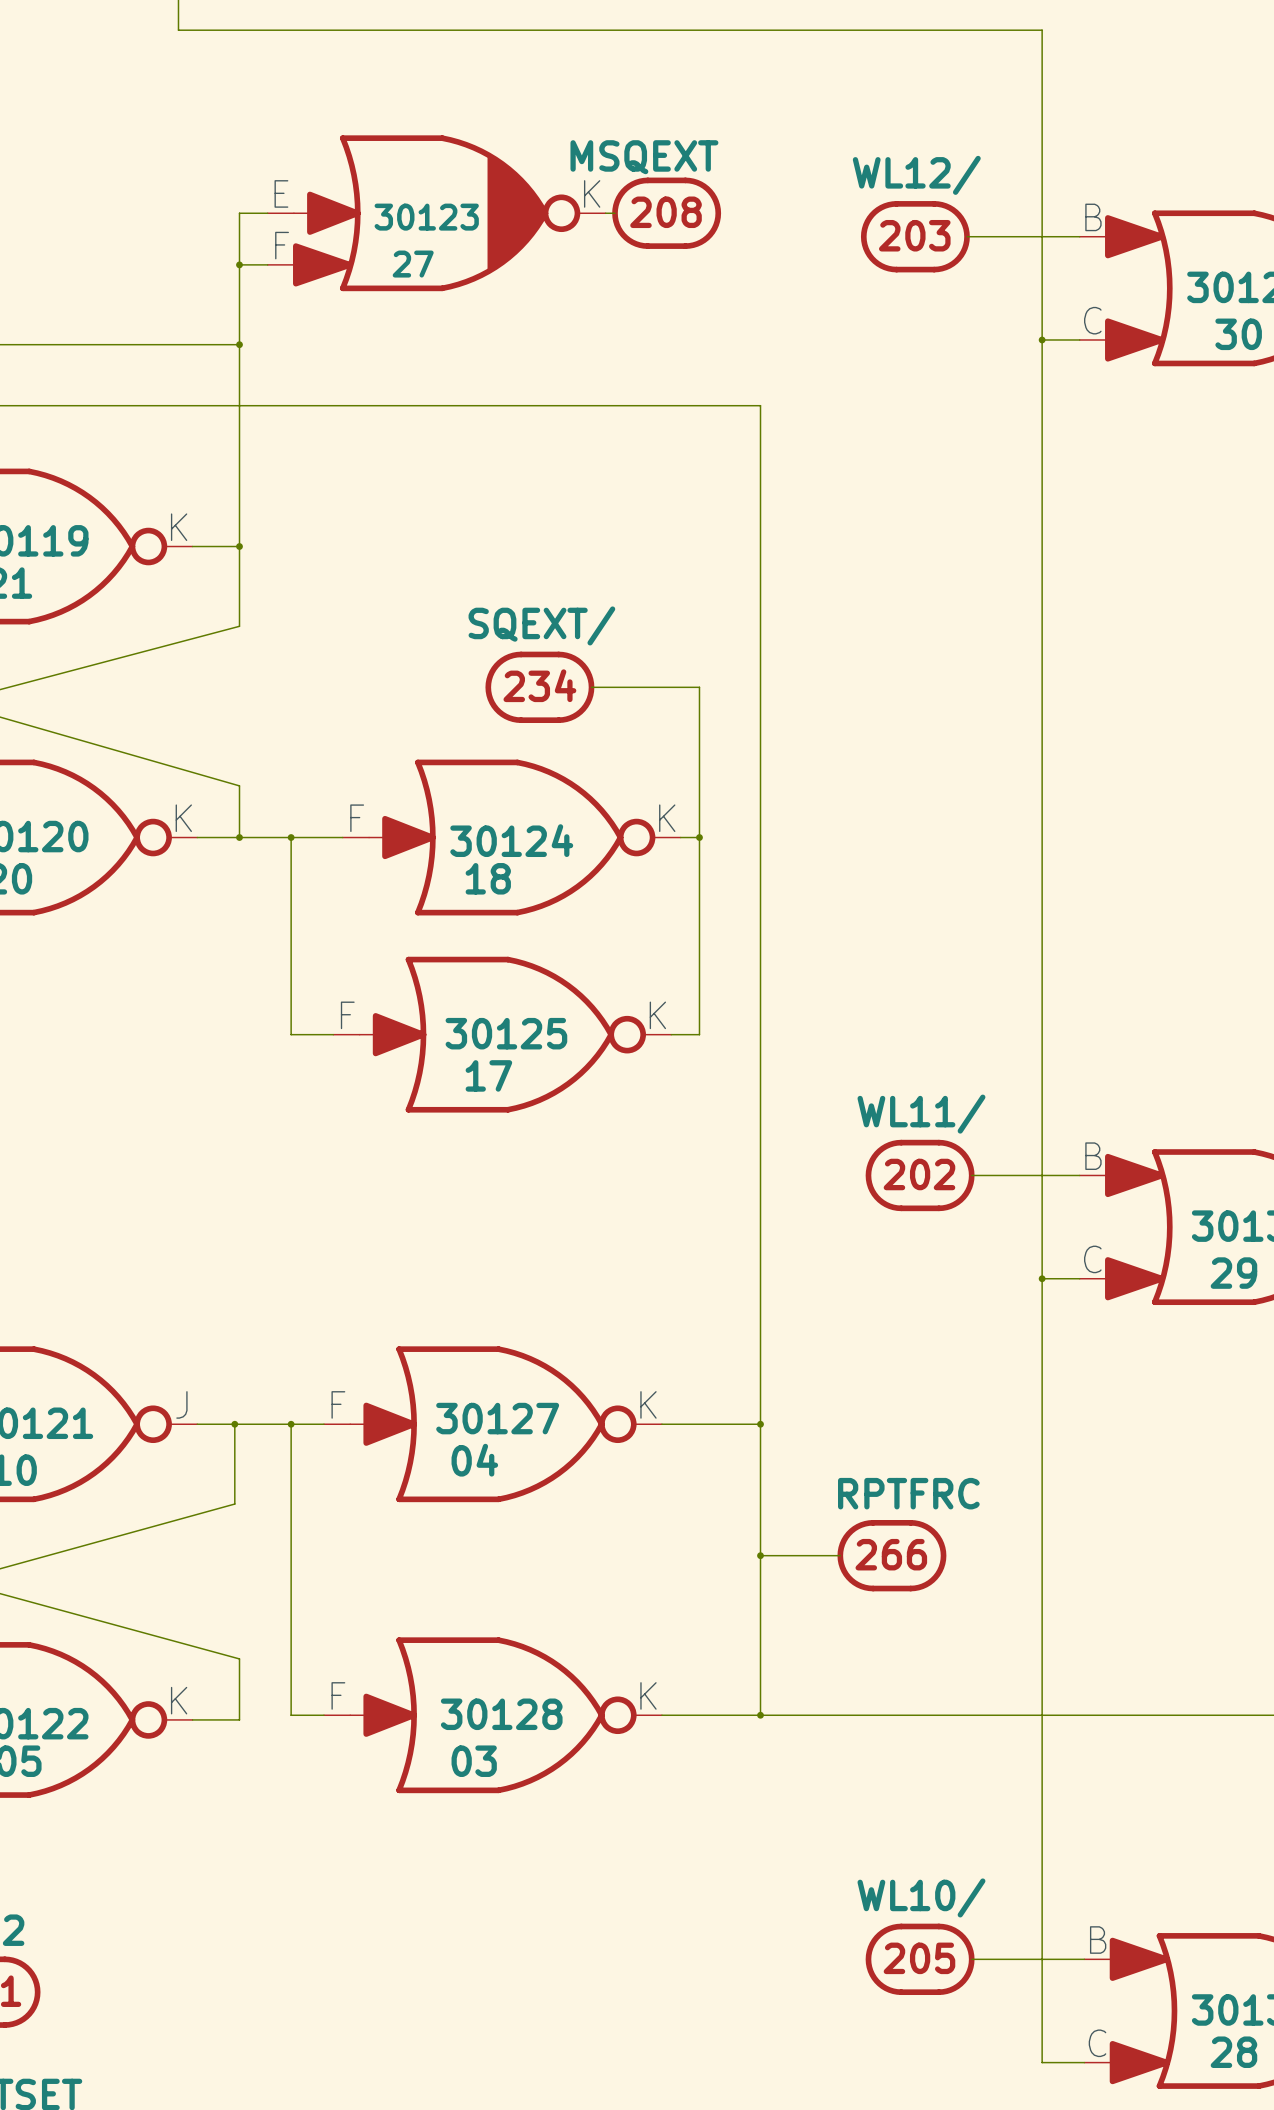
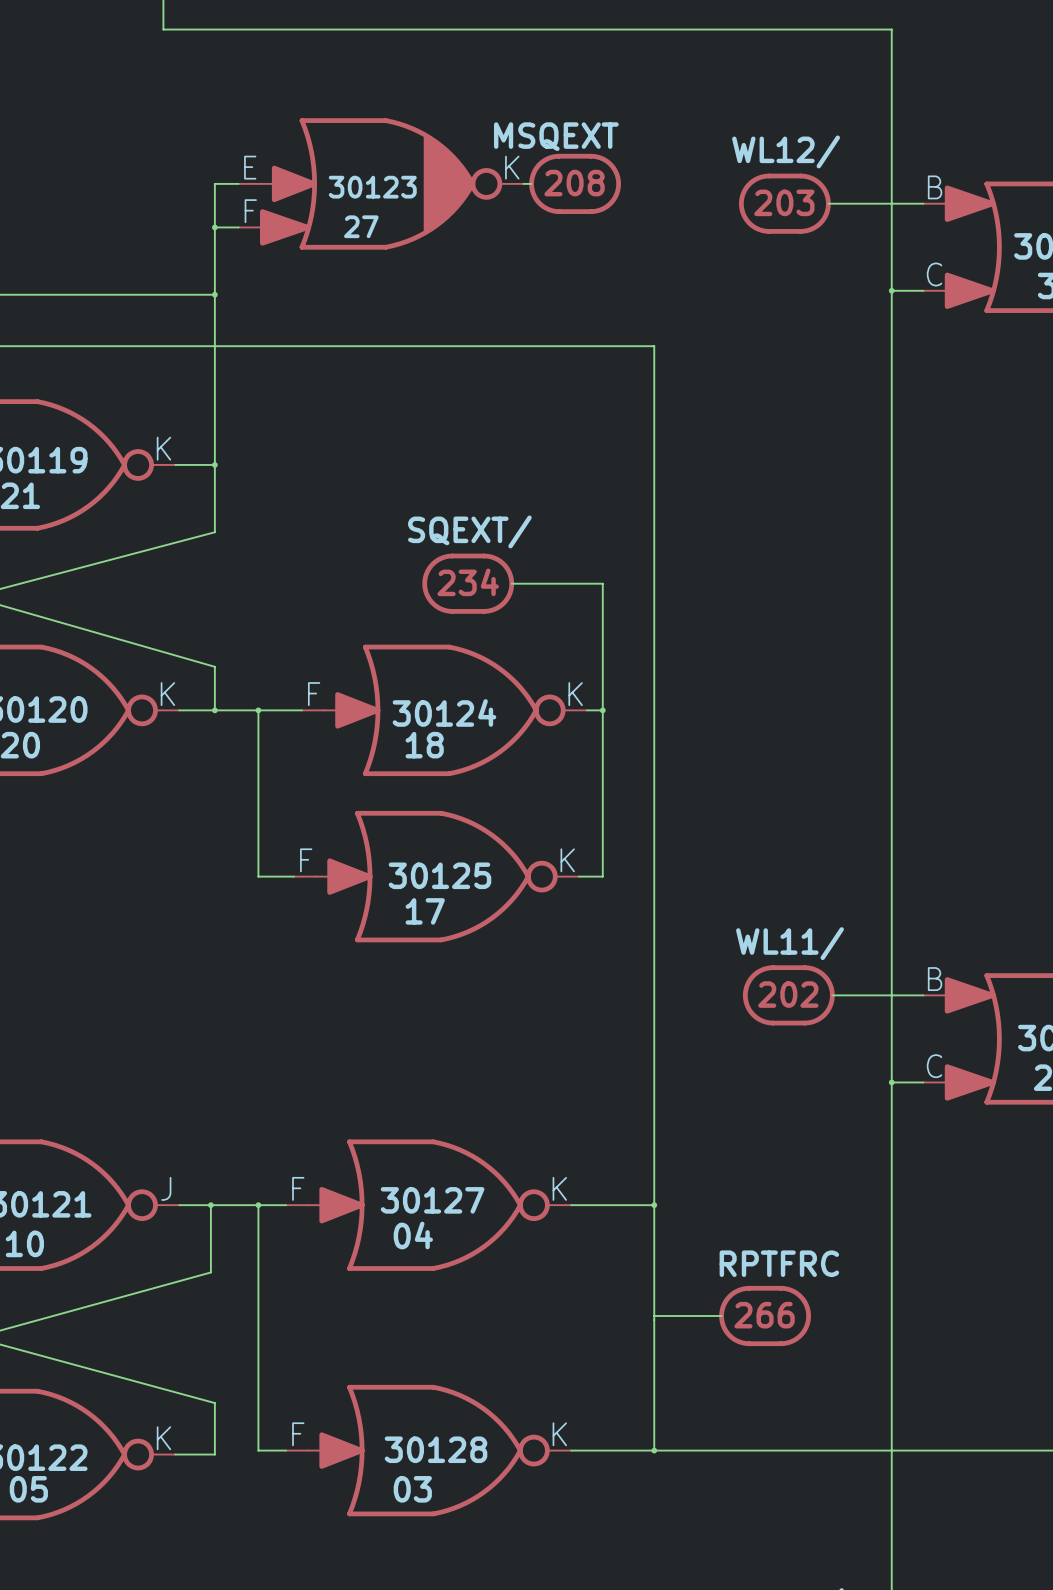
junction: (760, 1555) -> none

